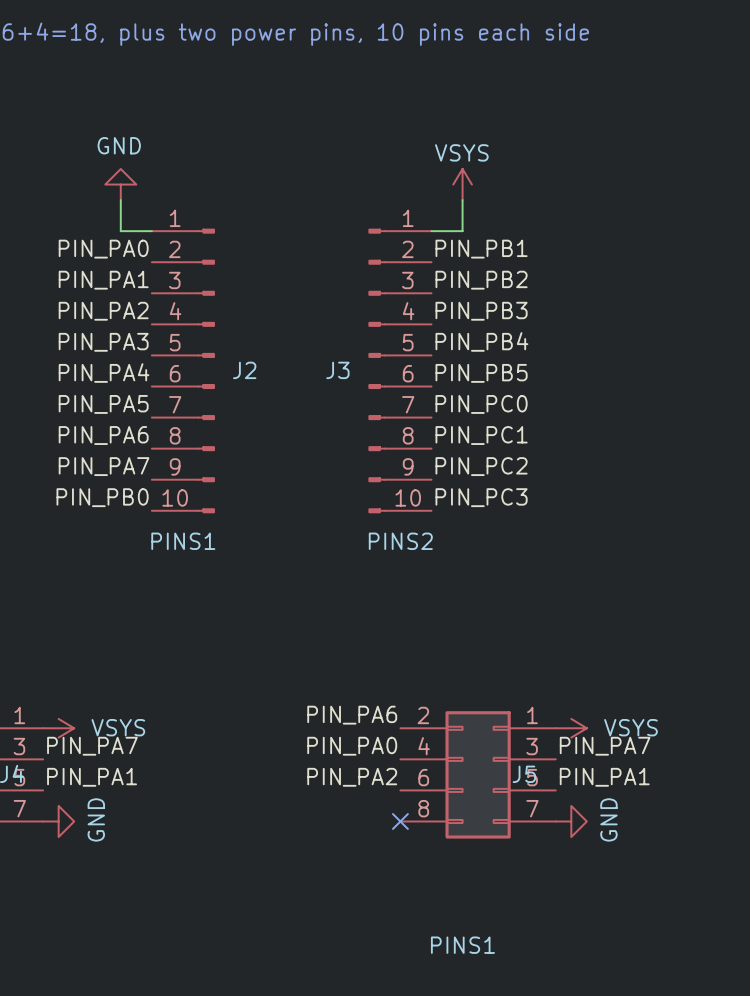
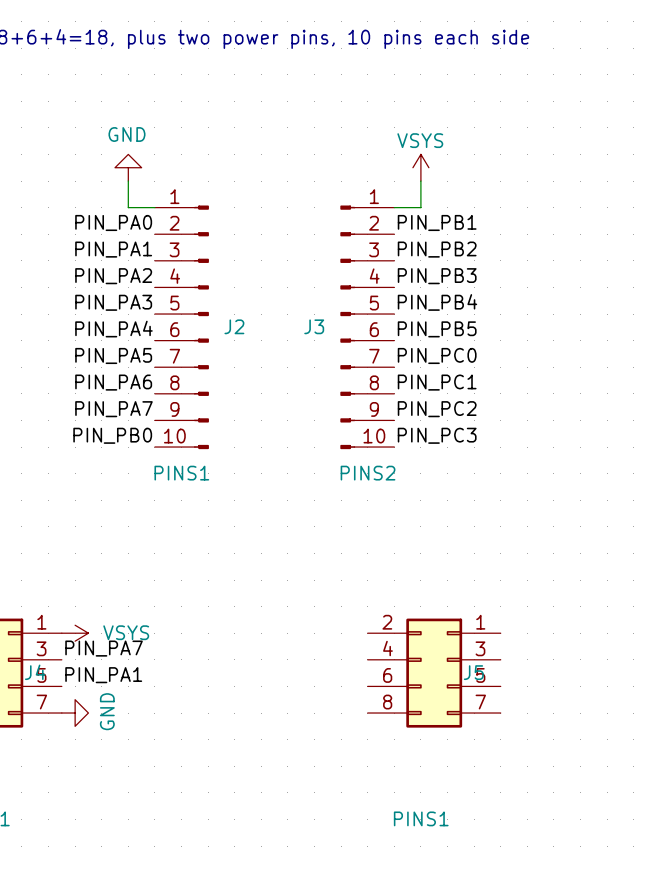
label: PIN_PA6 (352, 715) -> none
power symbol: VSYS (571, 728) -> none
label: PIN_PA0 (352, 746) -> none
label: PIN_PA7 (605, 746) -> none
label: PIN_PA2 (352, 777) -> none
label: PIN_PA1 (604, 777) -> none
no-connect mark: (400, 821) -> none
power symbol: GND (571, 821) -> none

